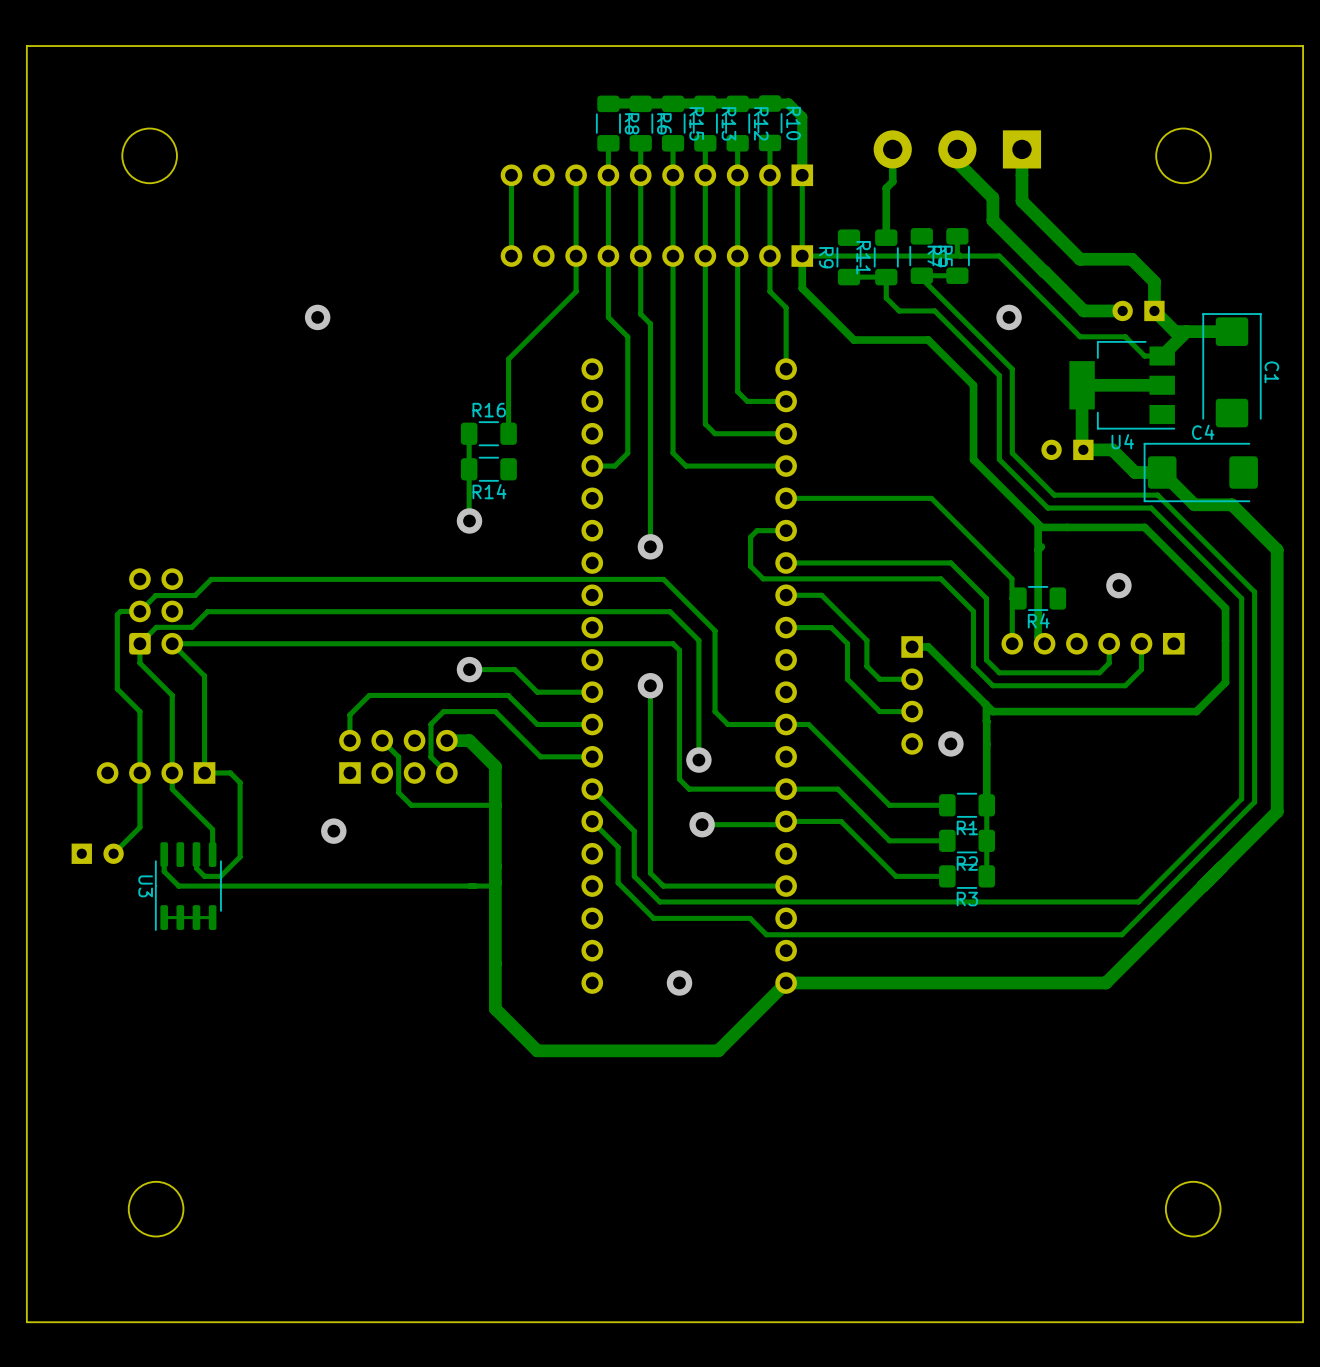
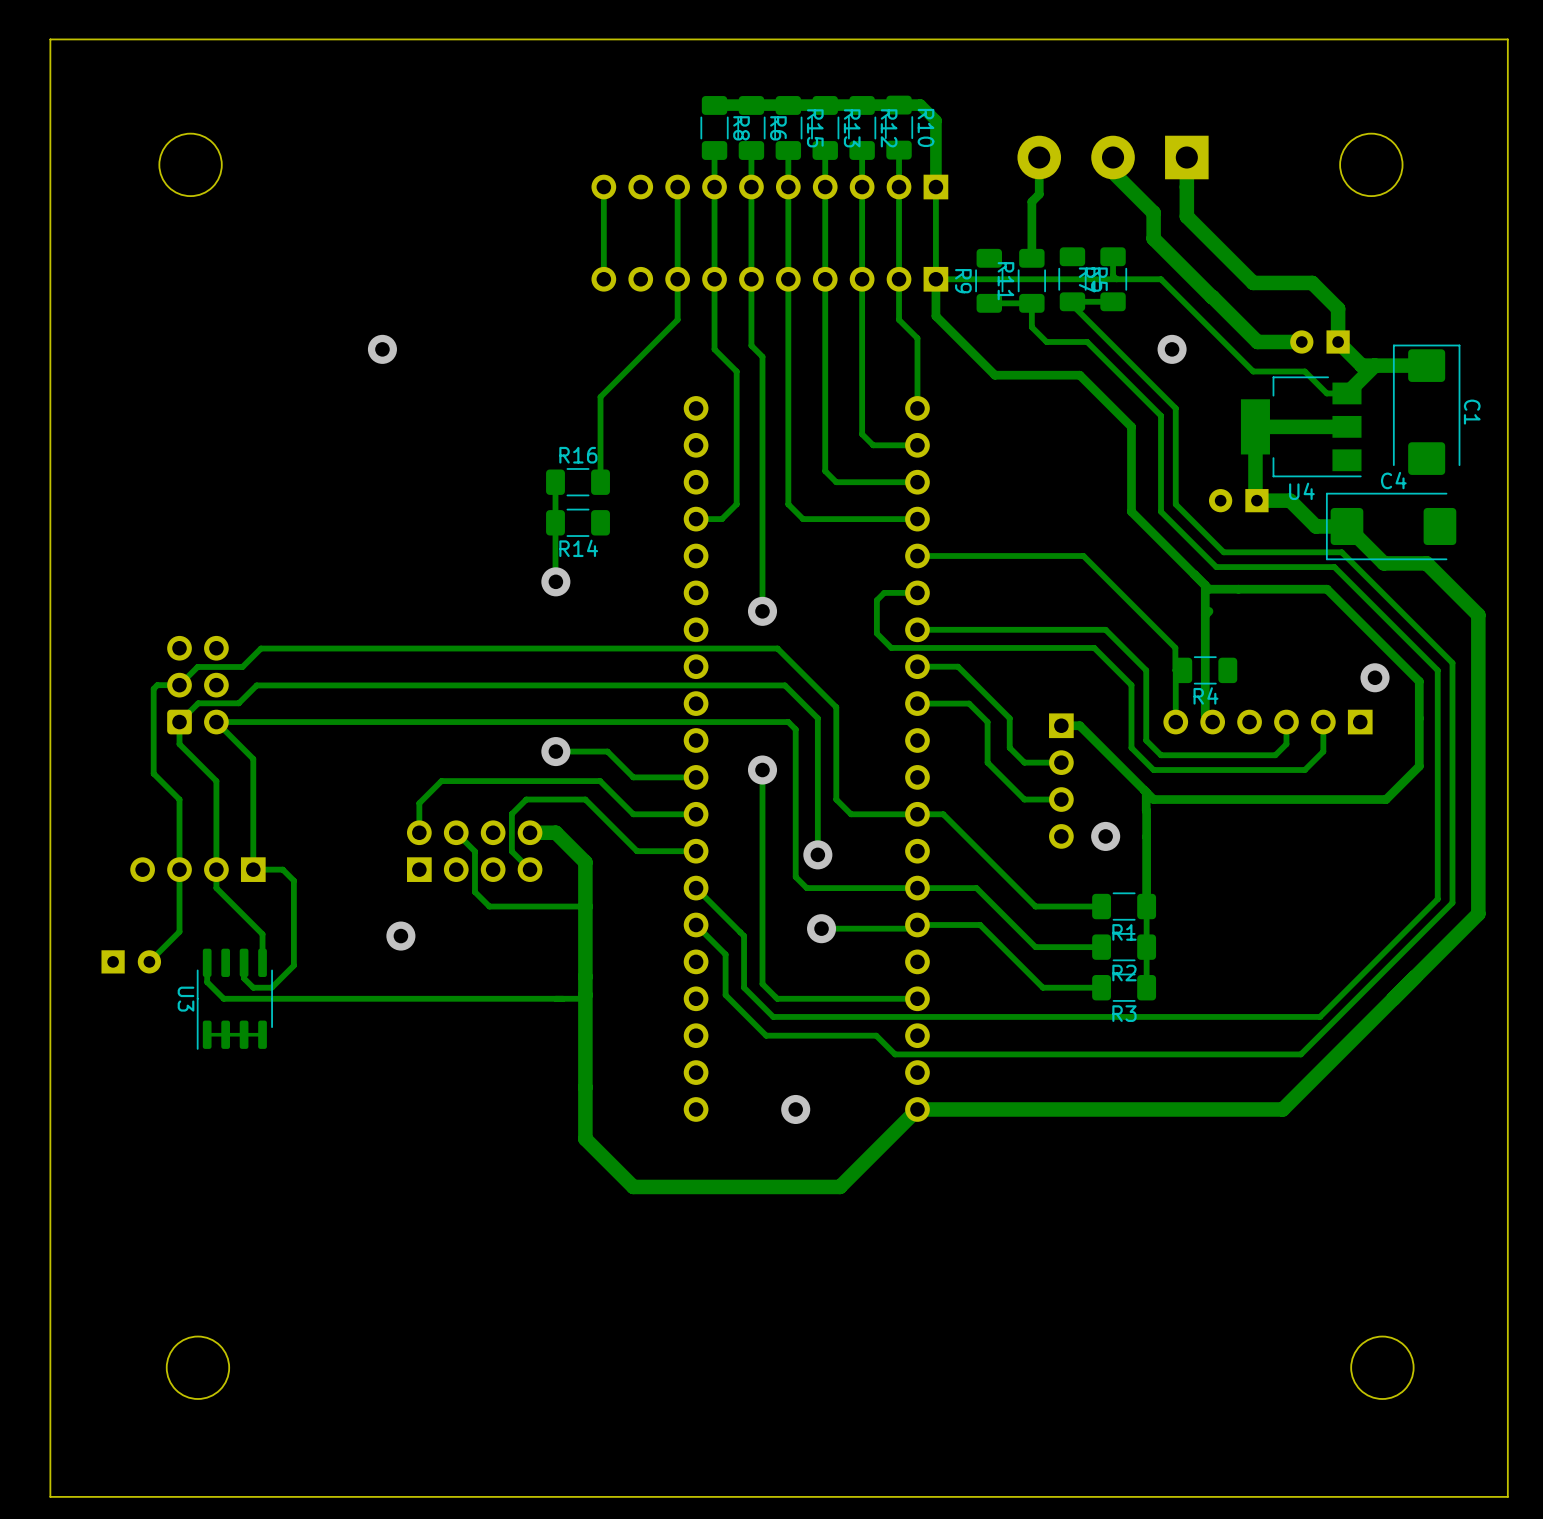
via position: (1118, 585) -> (1375, 677)

